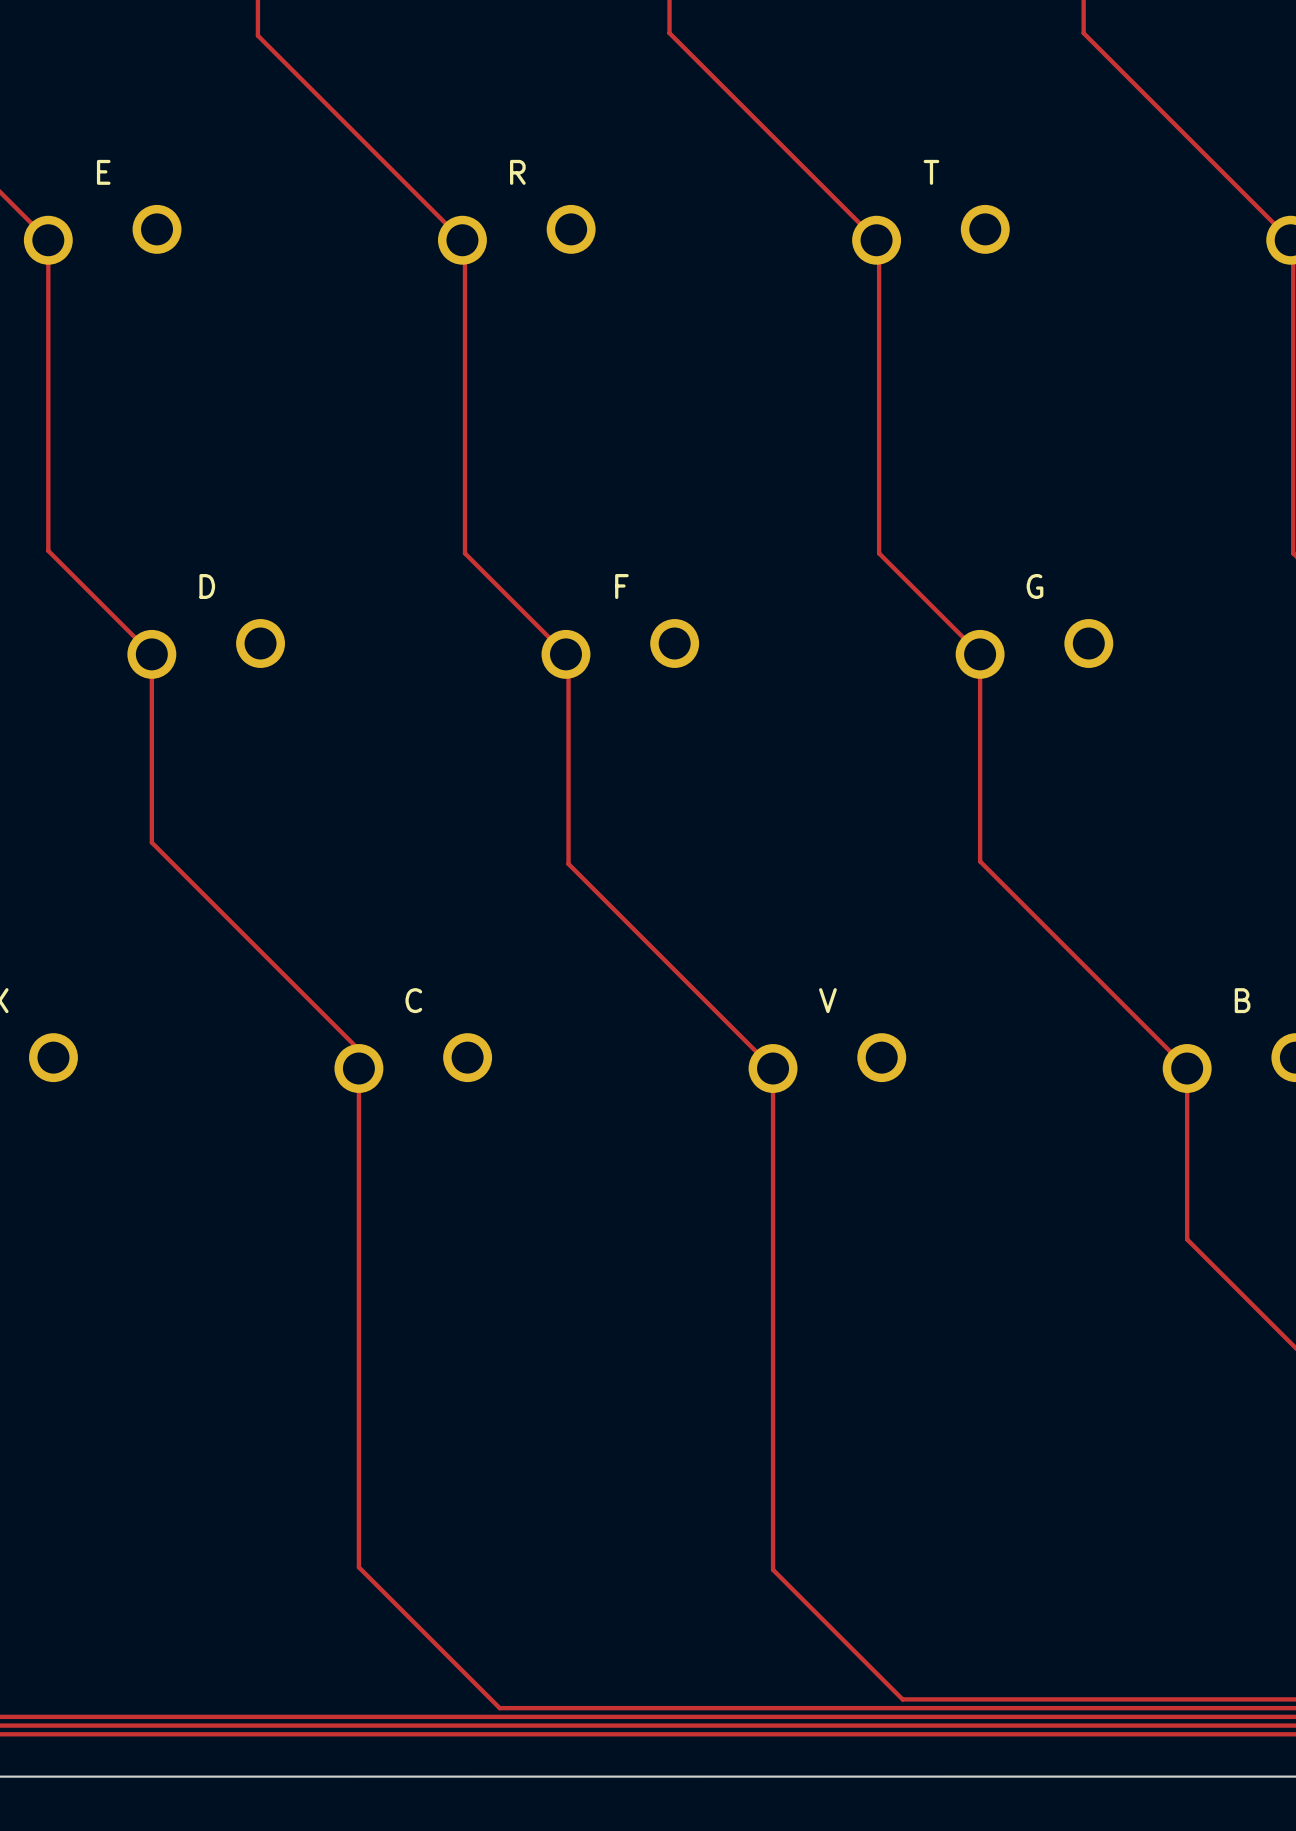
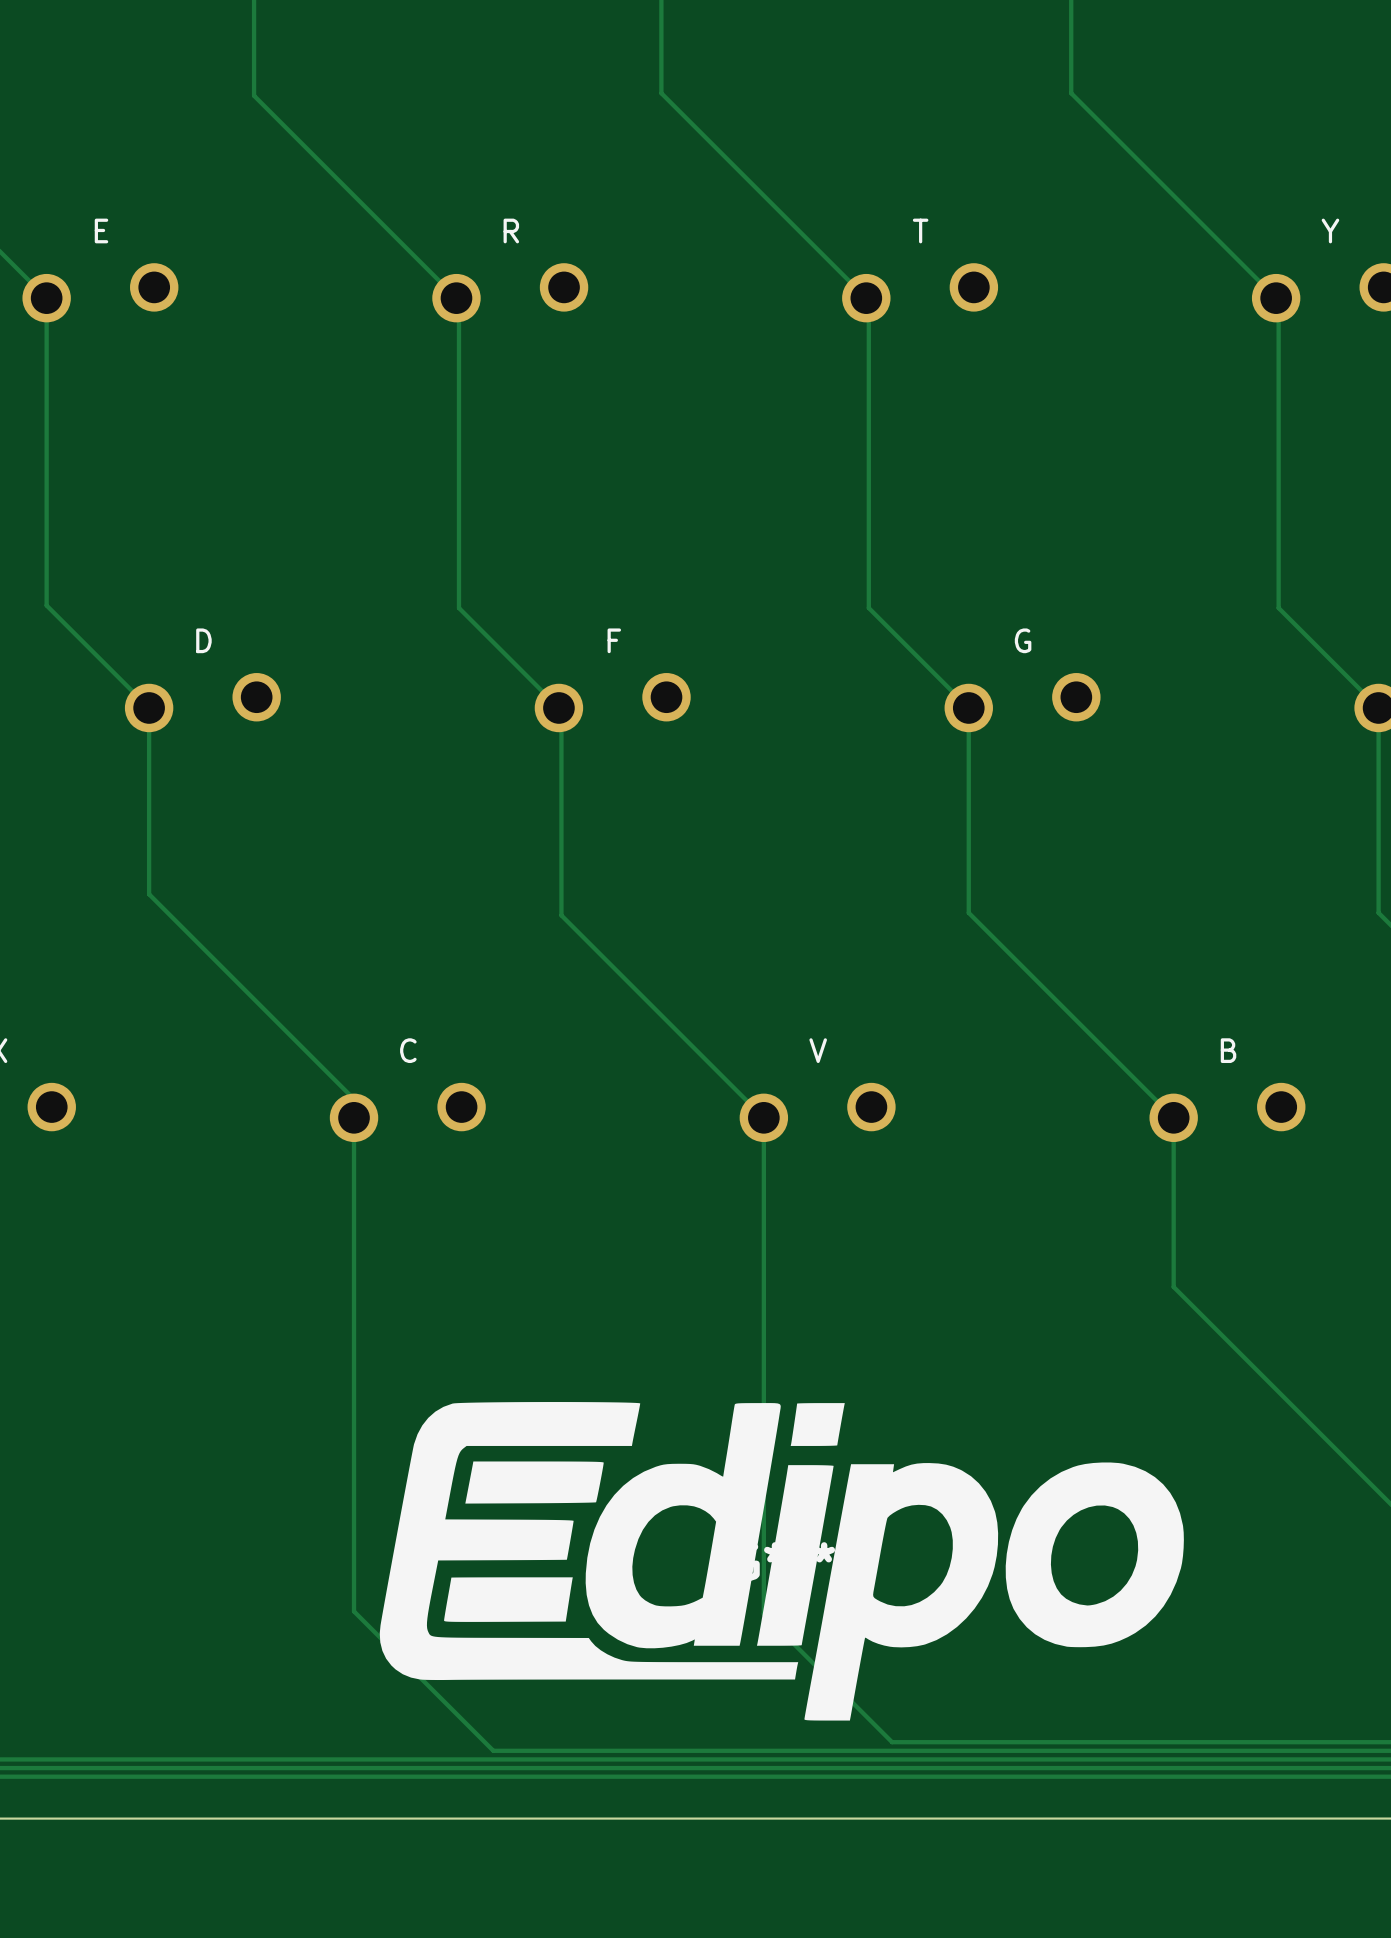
part: none -> (781, 1561)

